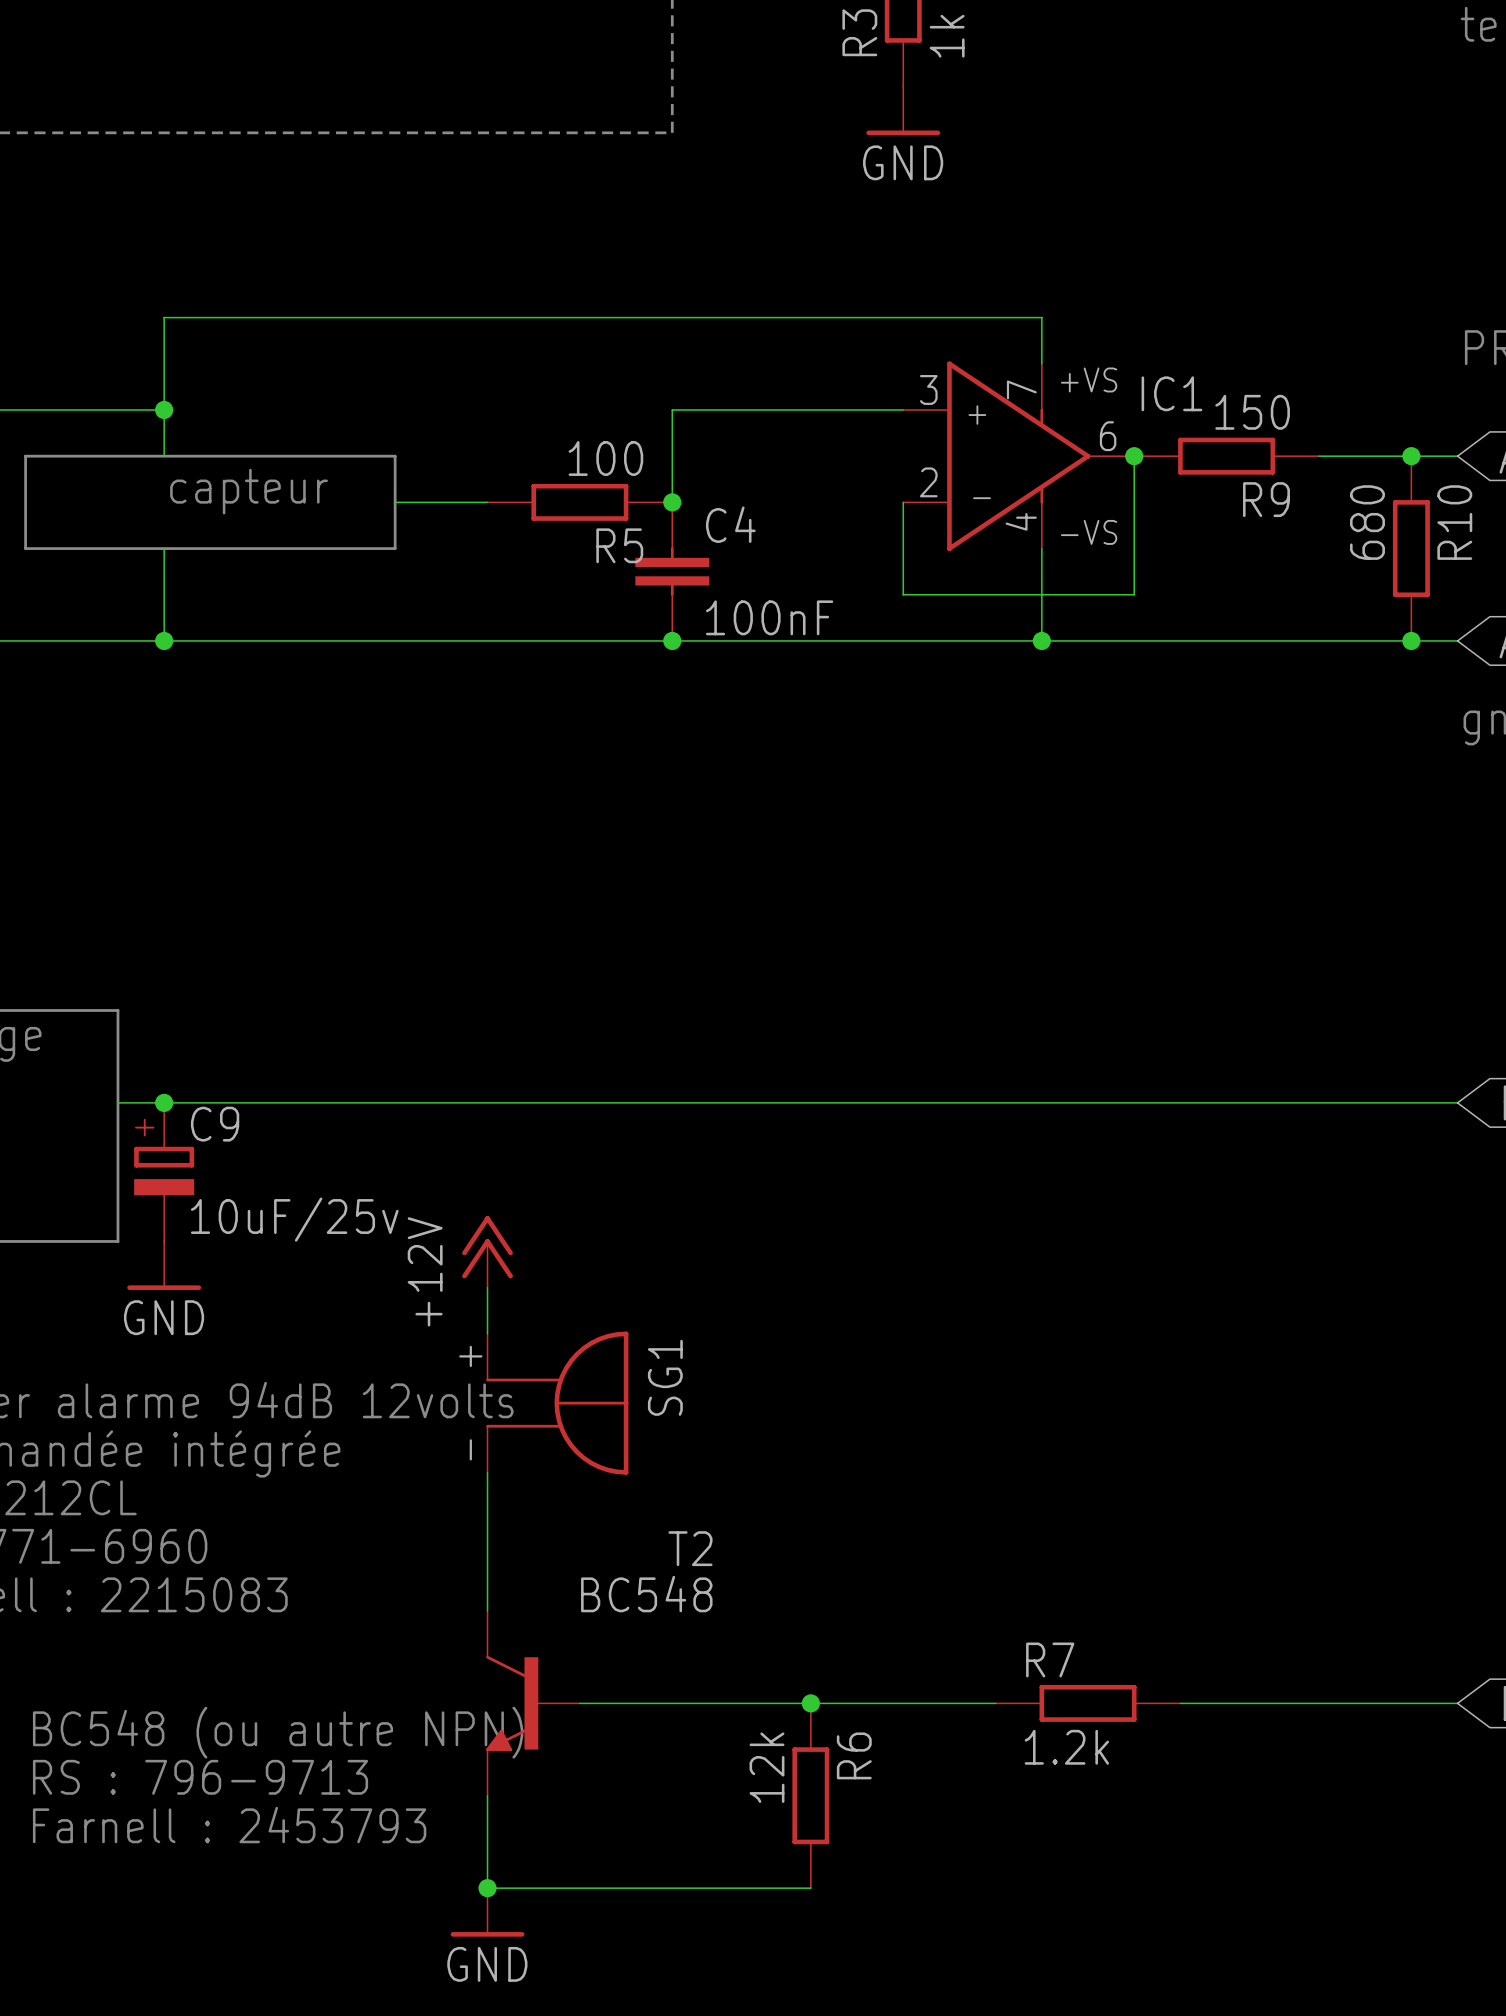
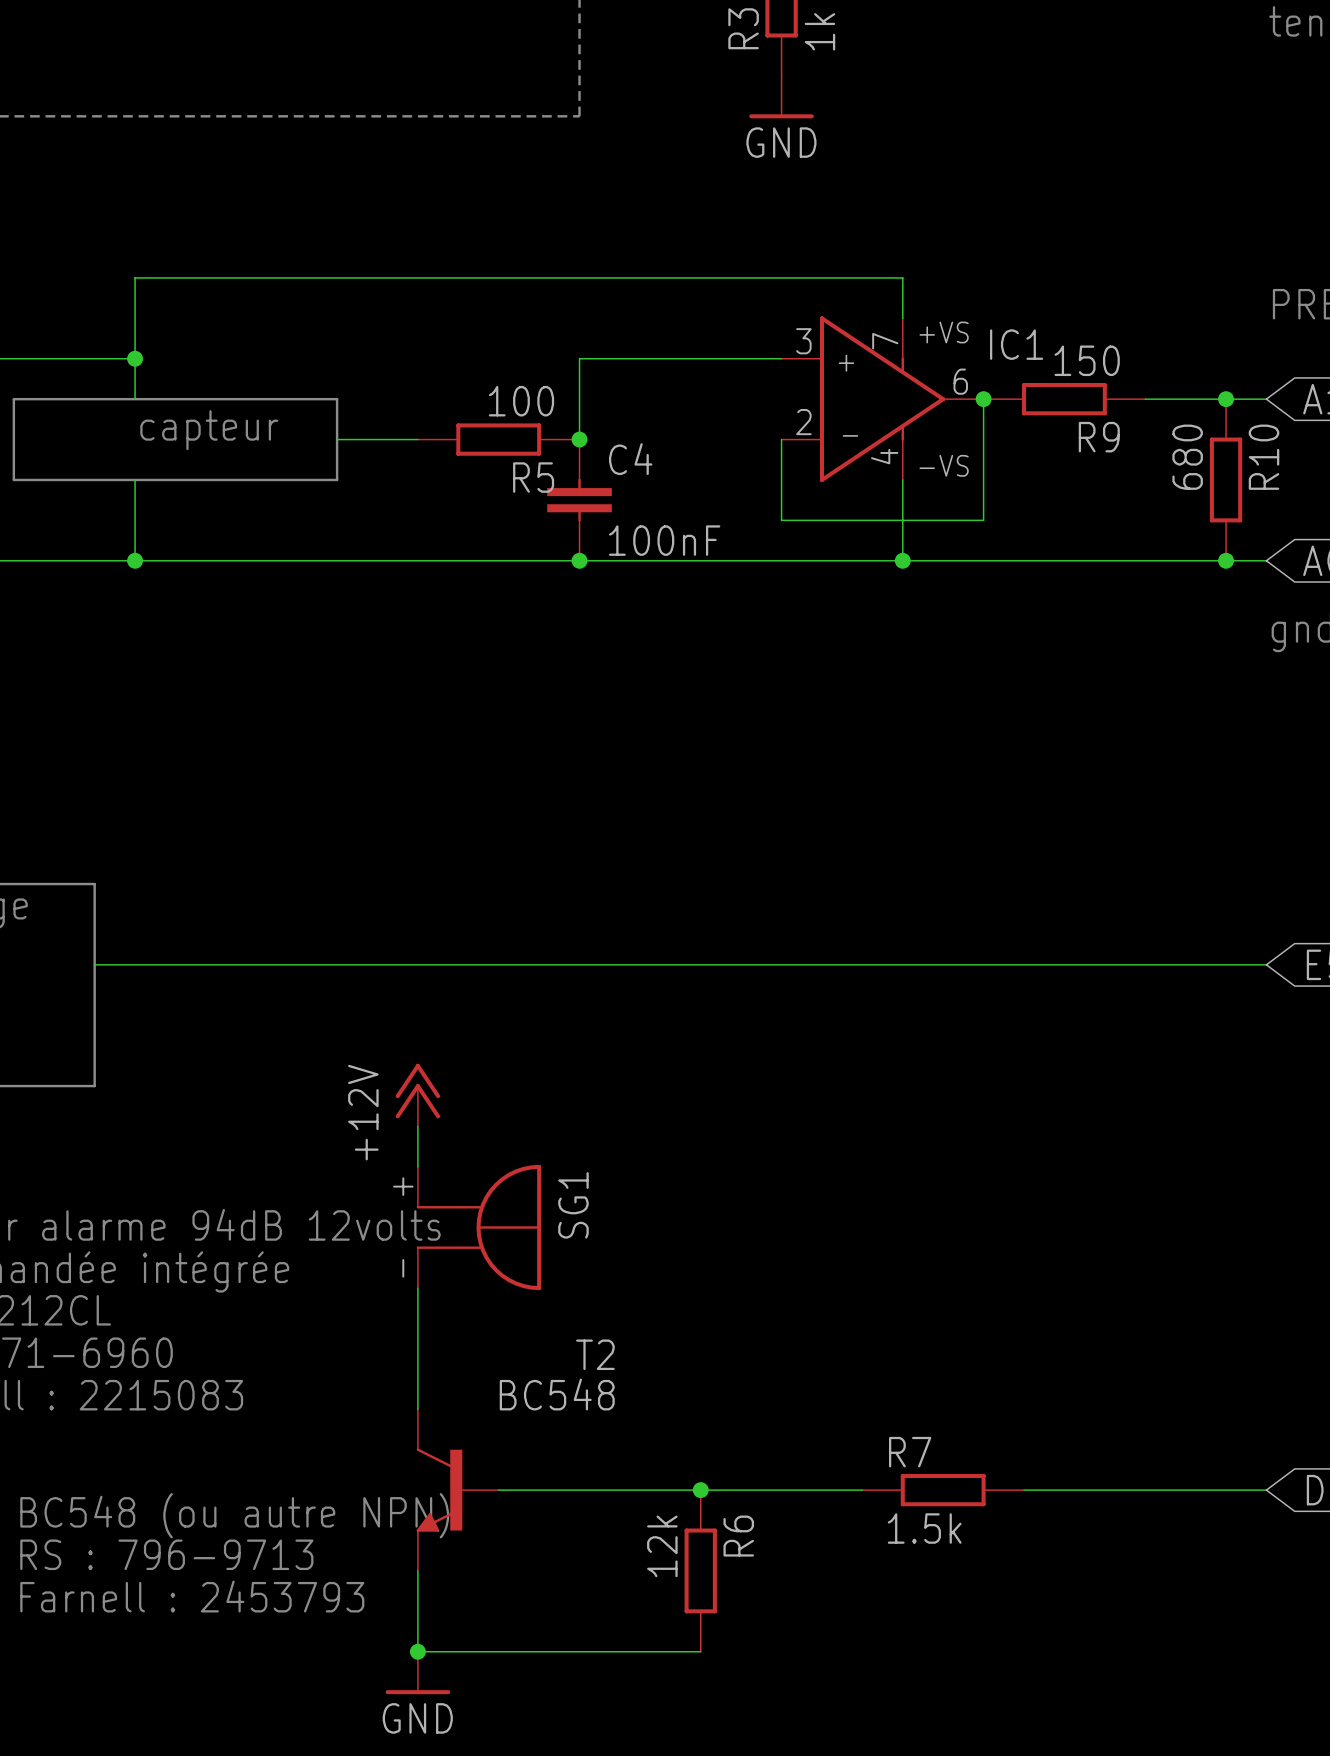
junction: (164, 1102) -> none
C9: 10uF/25v (164, 1172) -> none
power symbol: GND (164, 1265) -> none
R7 value: 1.2k (1066, 1747) -> 1.5k (924, 1528)

